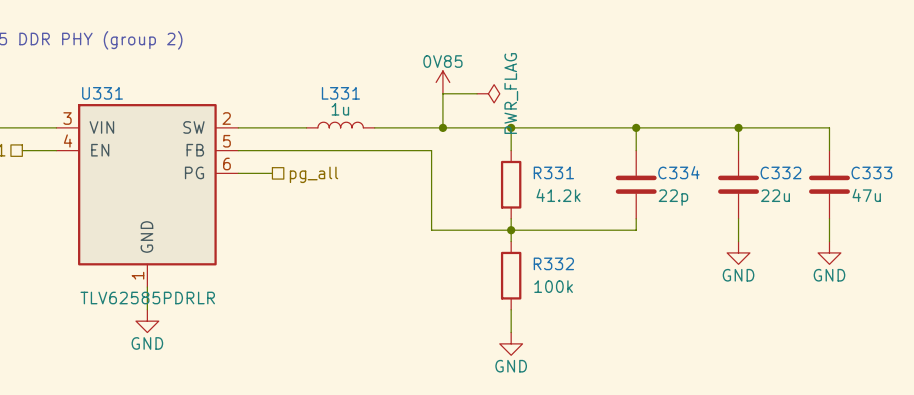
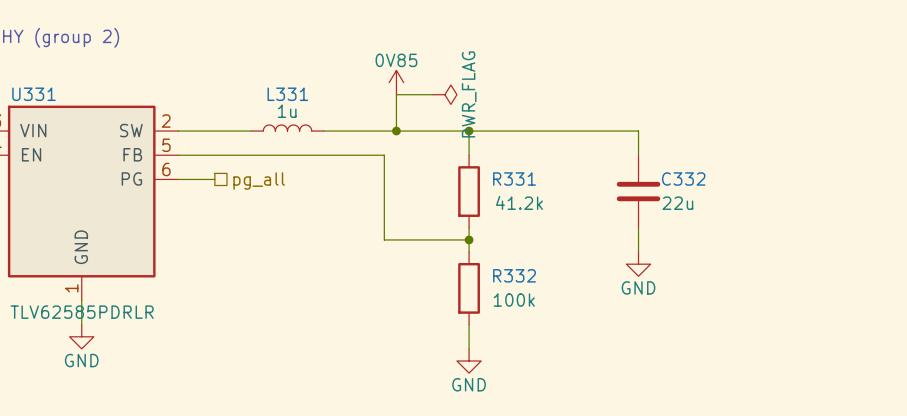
wire: (636, 127) (636, 150) -> none
junction: (636, 127) -> none
wire: (670, 127) (829, 127) (829, 150) -> (638, 131) (638, 155)
wire: (738, 127) (738, 150) -> none
junction: (738, 127) -> none
C334: 22p (636, 184) -> none
C332 position: (738, 184) -> (638, 191)
C333: 47u (829, 184) -> none
wire: (636, 218) (636, 230) (511, 230) -> none
wire: (738, 218) (738, 241) -> (638, 227) (638, 252)
wire: (829, 218) (829, 241) -> none
power symbol position: GND (738, 252) -> GND (638, 264)
power symbol: GND (829, 252) -> none

